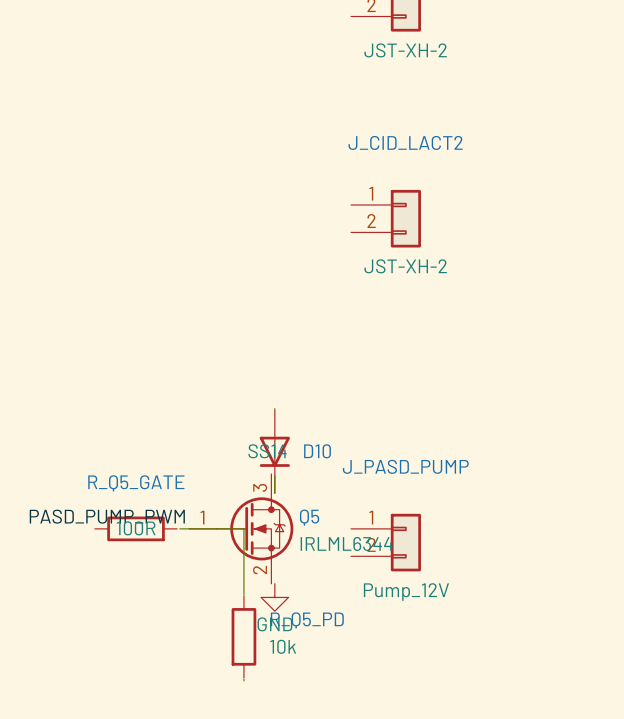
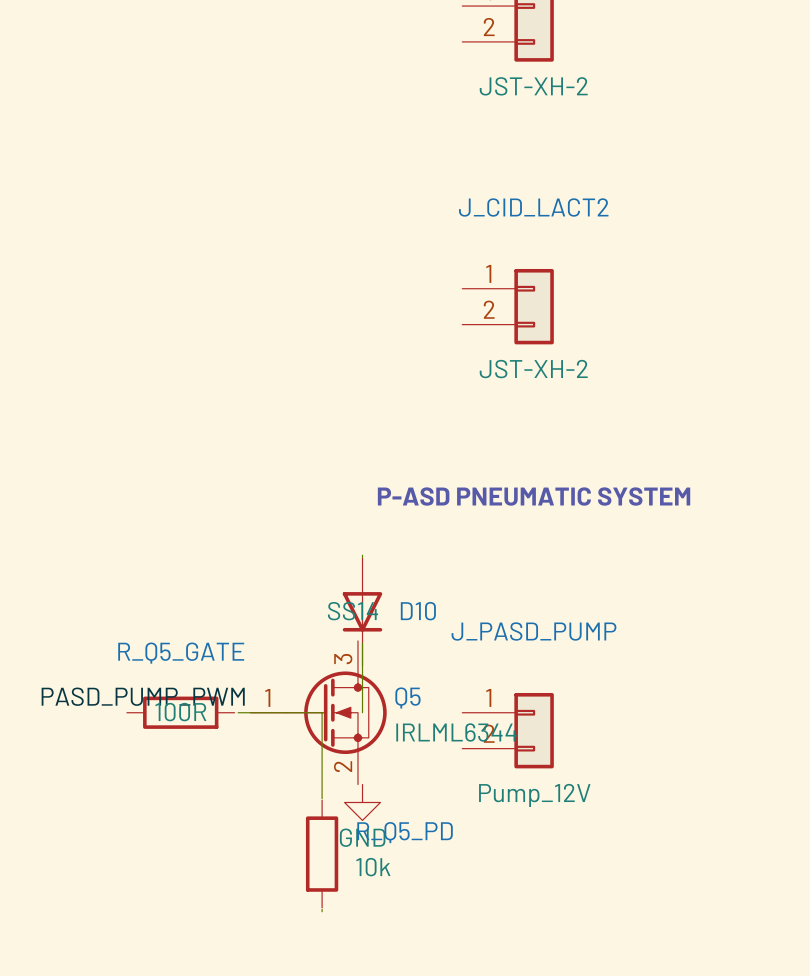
text: none -> P-ASD PNEUMATIC SYSTEM (534, 496)
Q5 symbol: [189, 474, 294, 584] -> [250, 640, 387, 785]
wire: none -> (362, 666) (362, 712)

